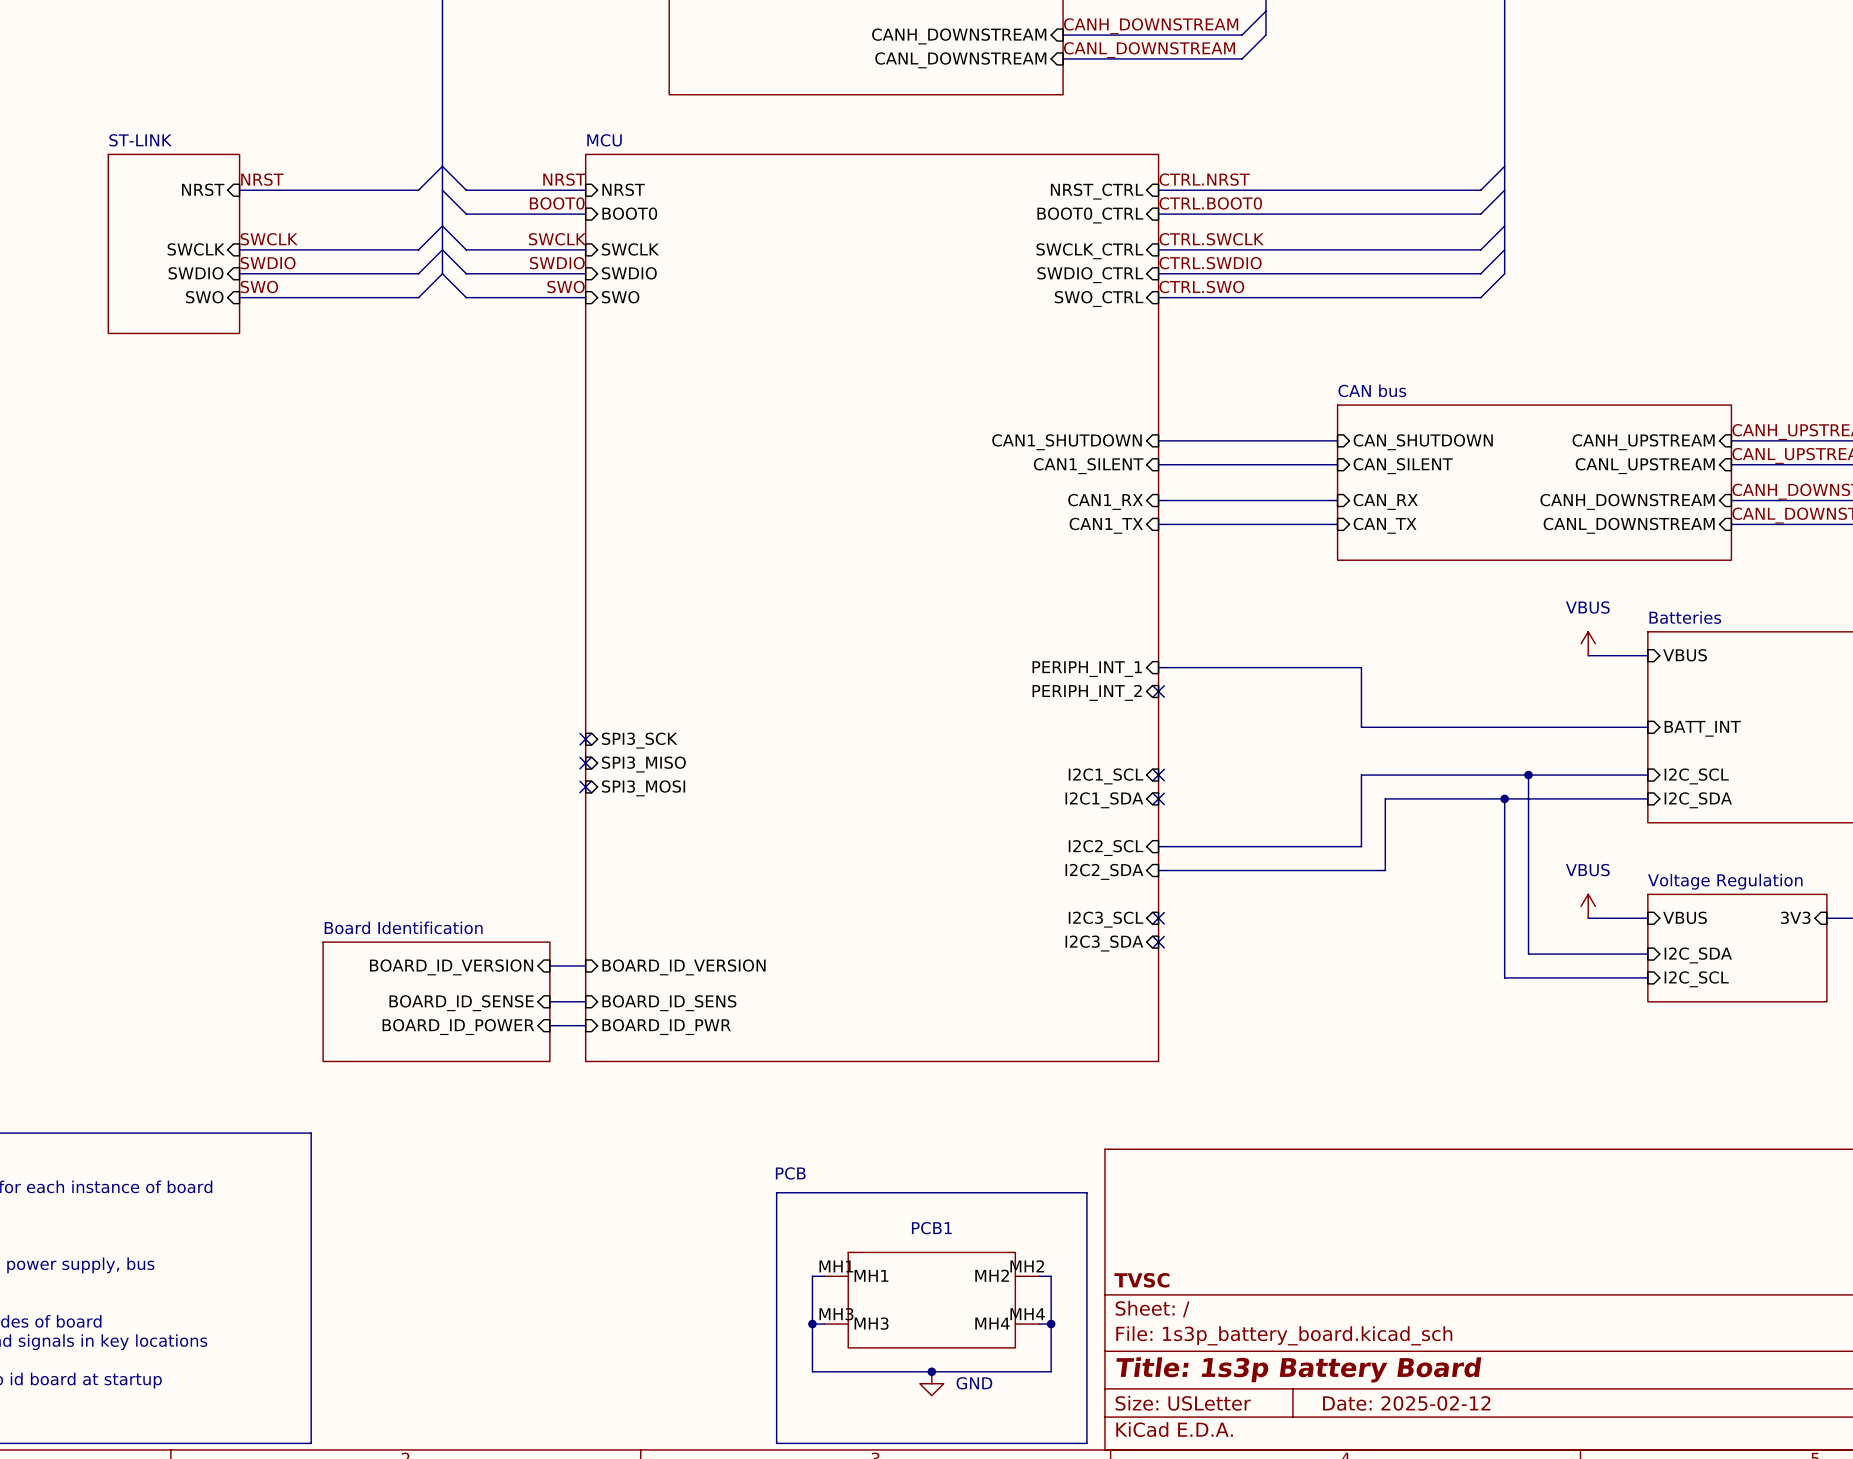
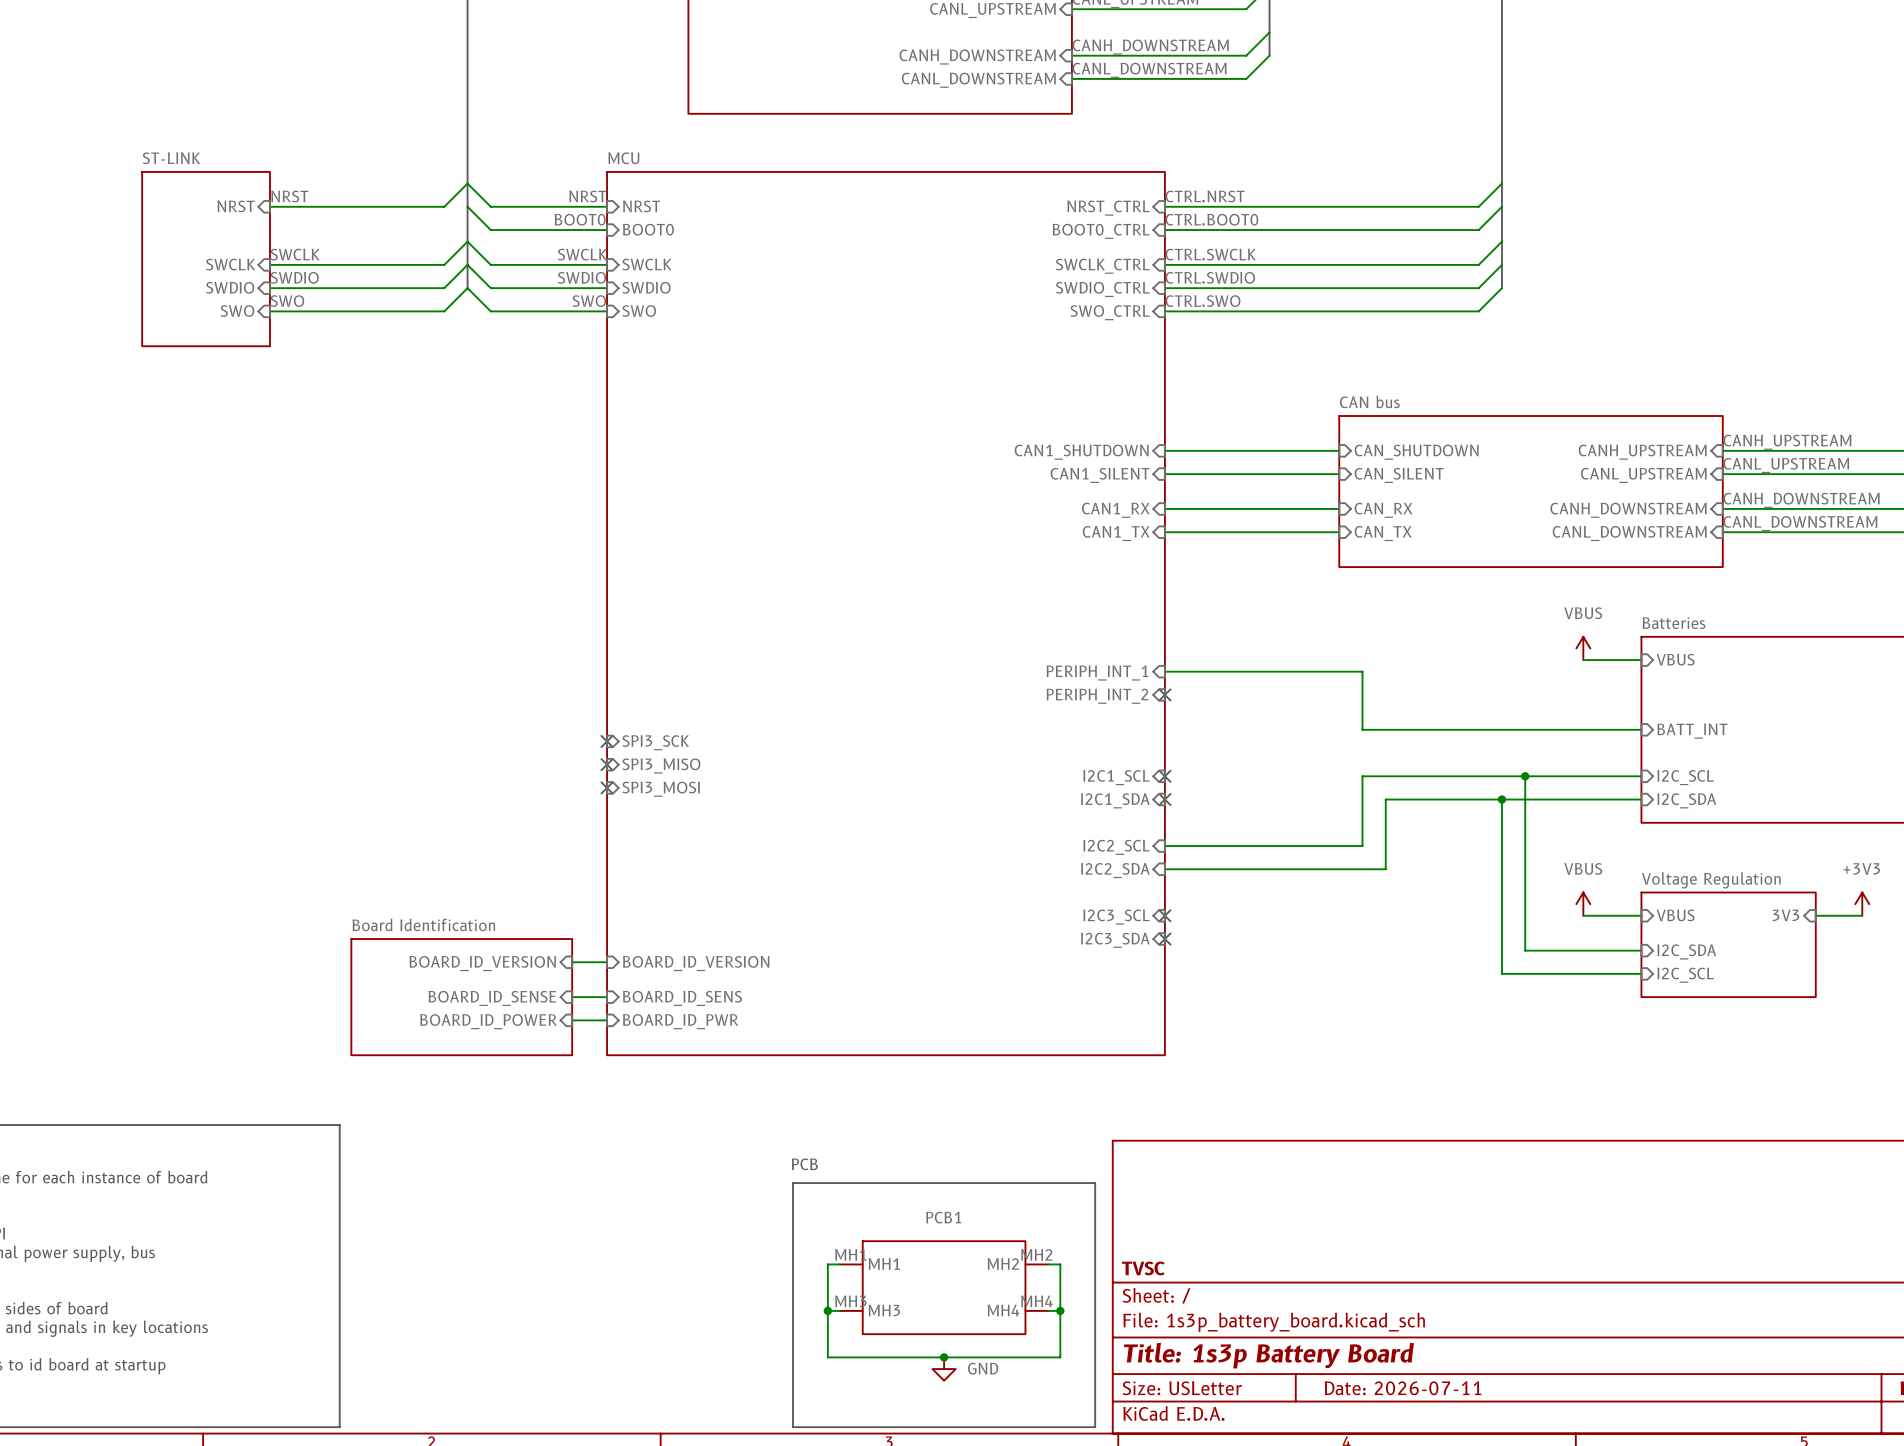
title block: Date: 2025-02-12 (1406, 1403) -> Date: 2026-07-11 (1403, 1388)

